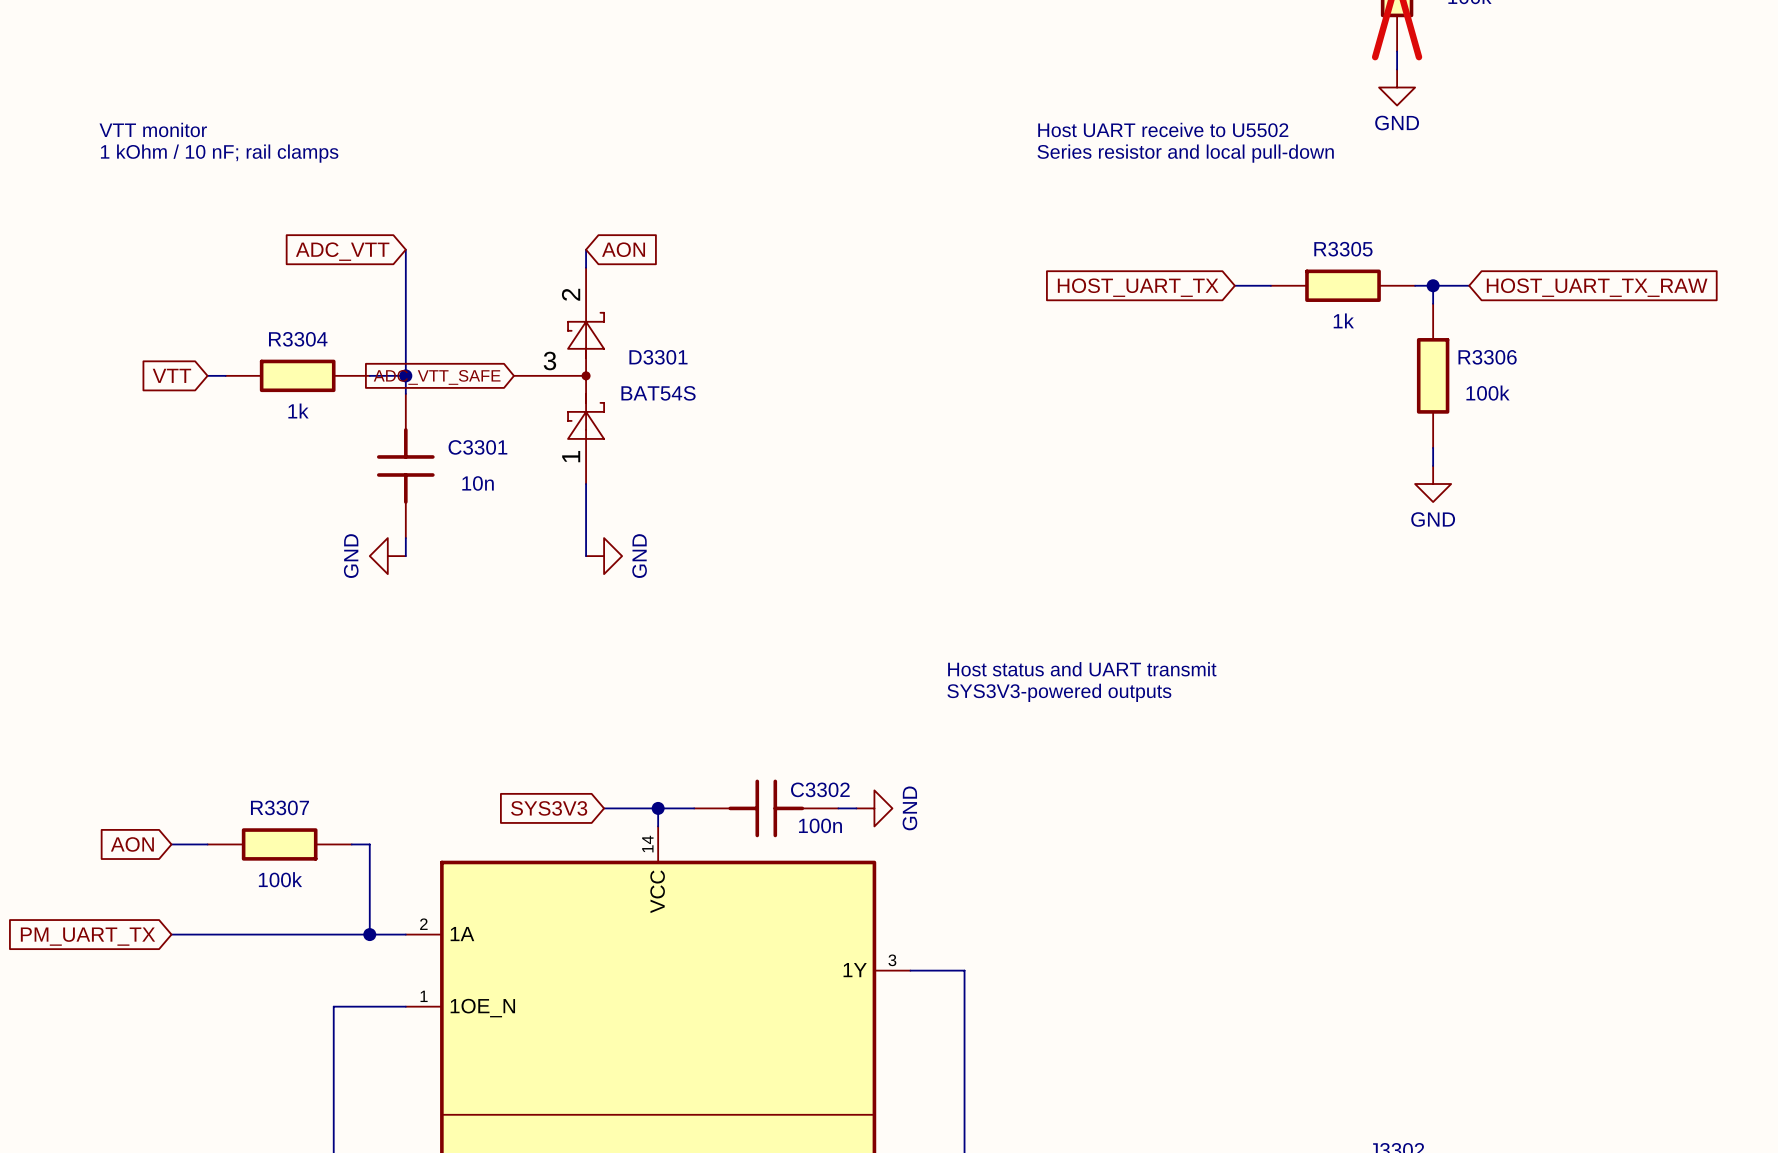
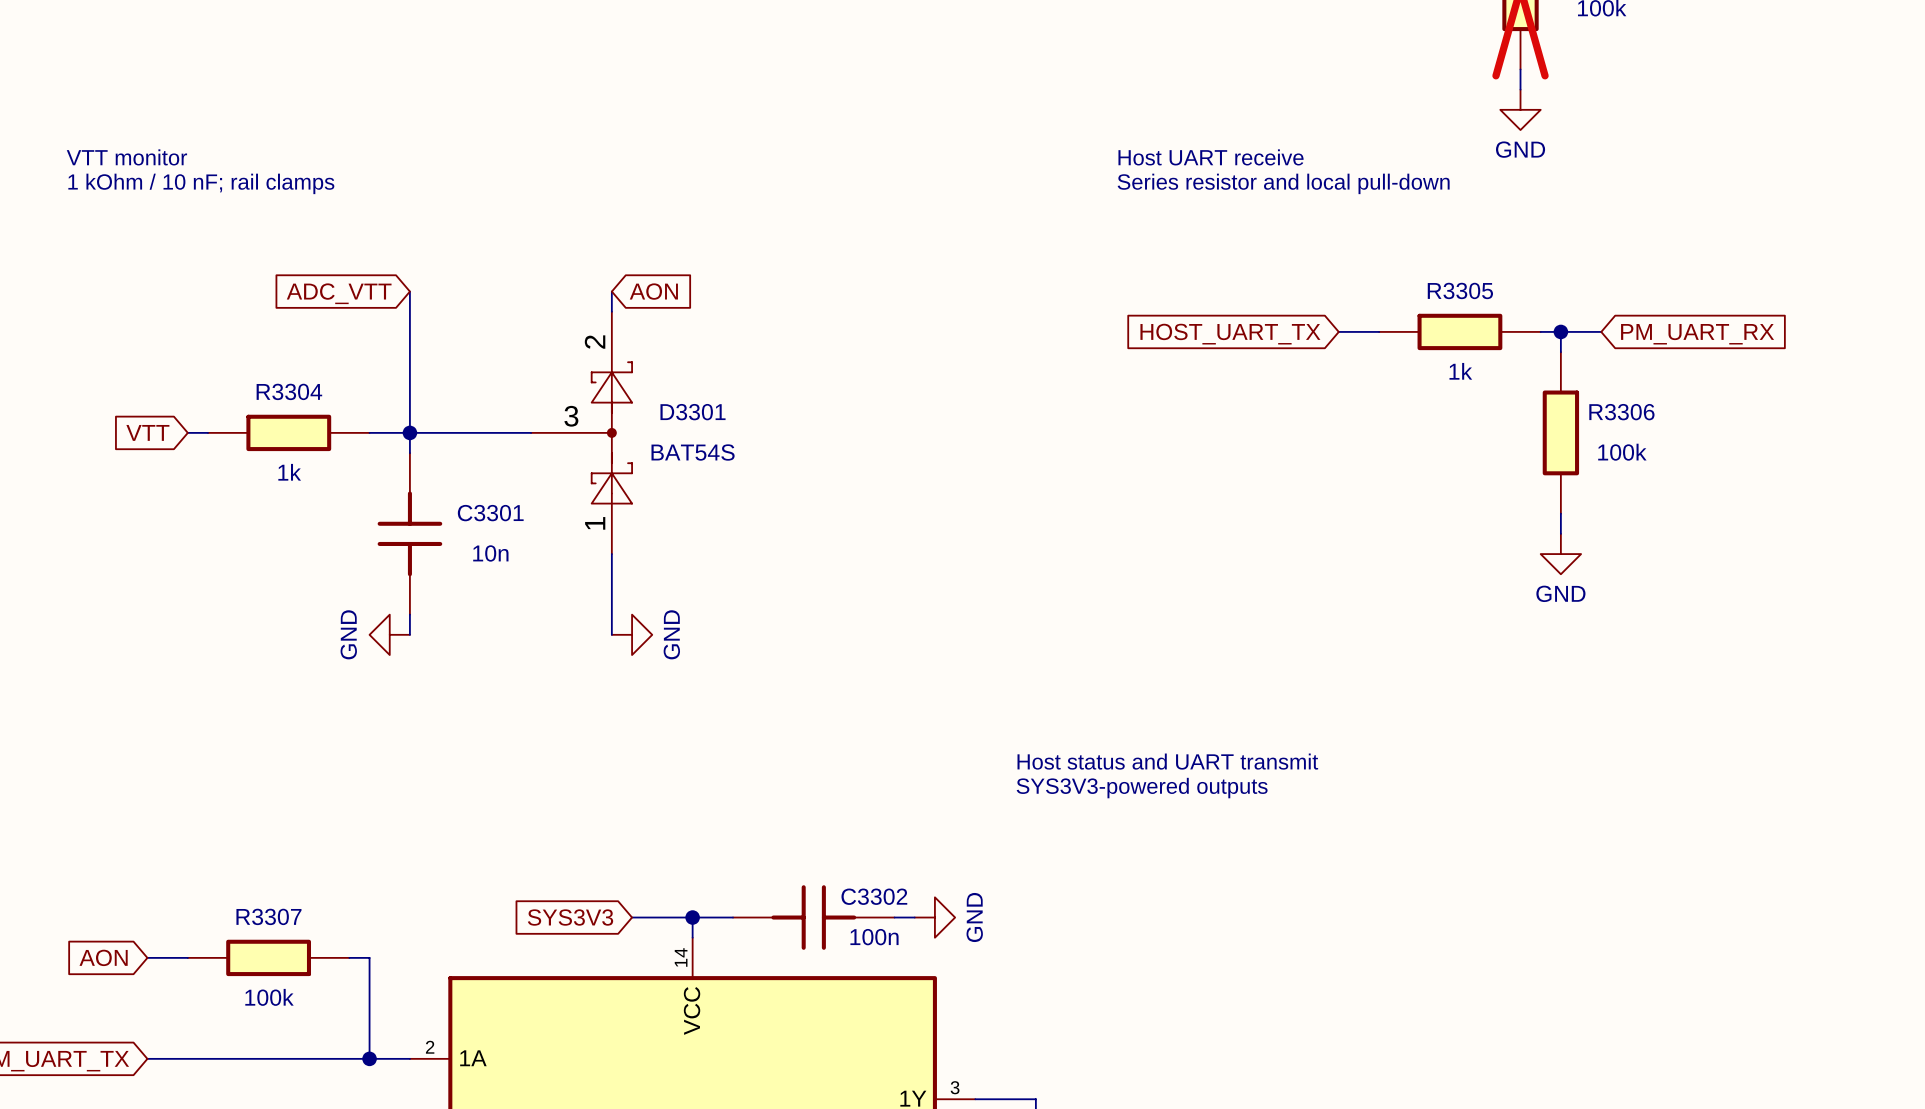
text: Host UART receive to U5502 (1163, 129) -> Host UART receive (1211, 157)
global label: HOST_UART_TX_RAW (1597, 287) -> PM_UART_RX (1697, 334)
wire: none -> (409, 432) (531, 432)
global label: ADC_VTT_SAFE (437, 377) -> none

